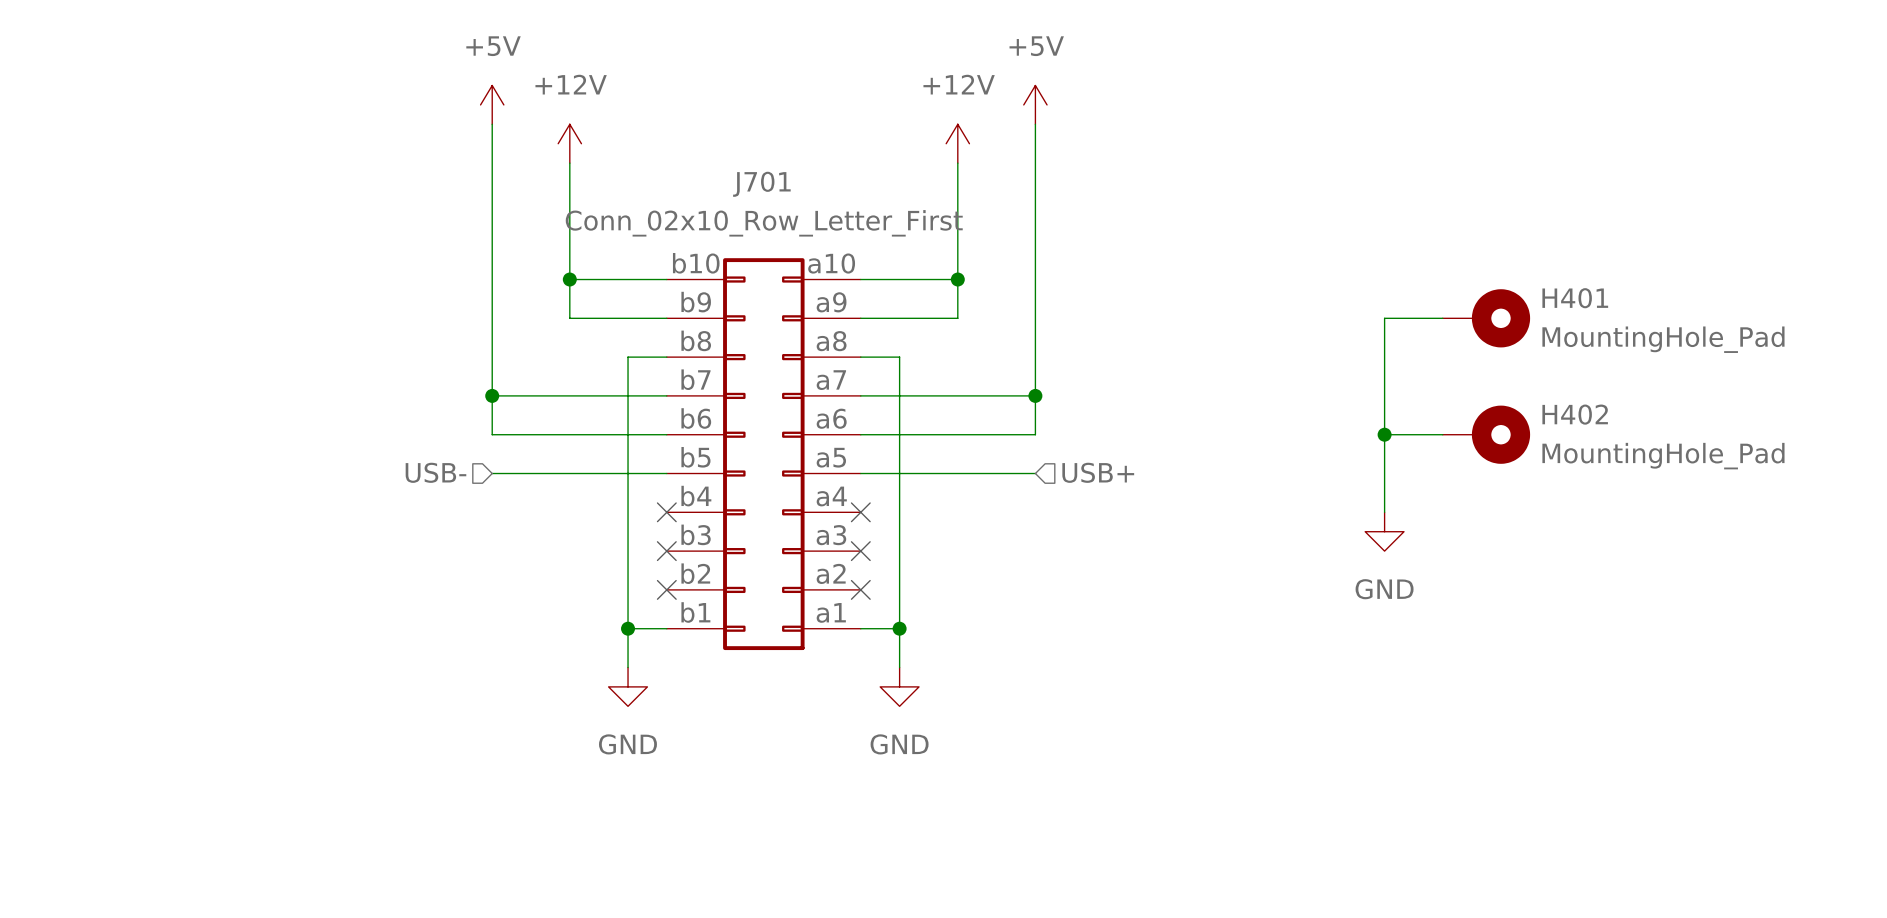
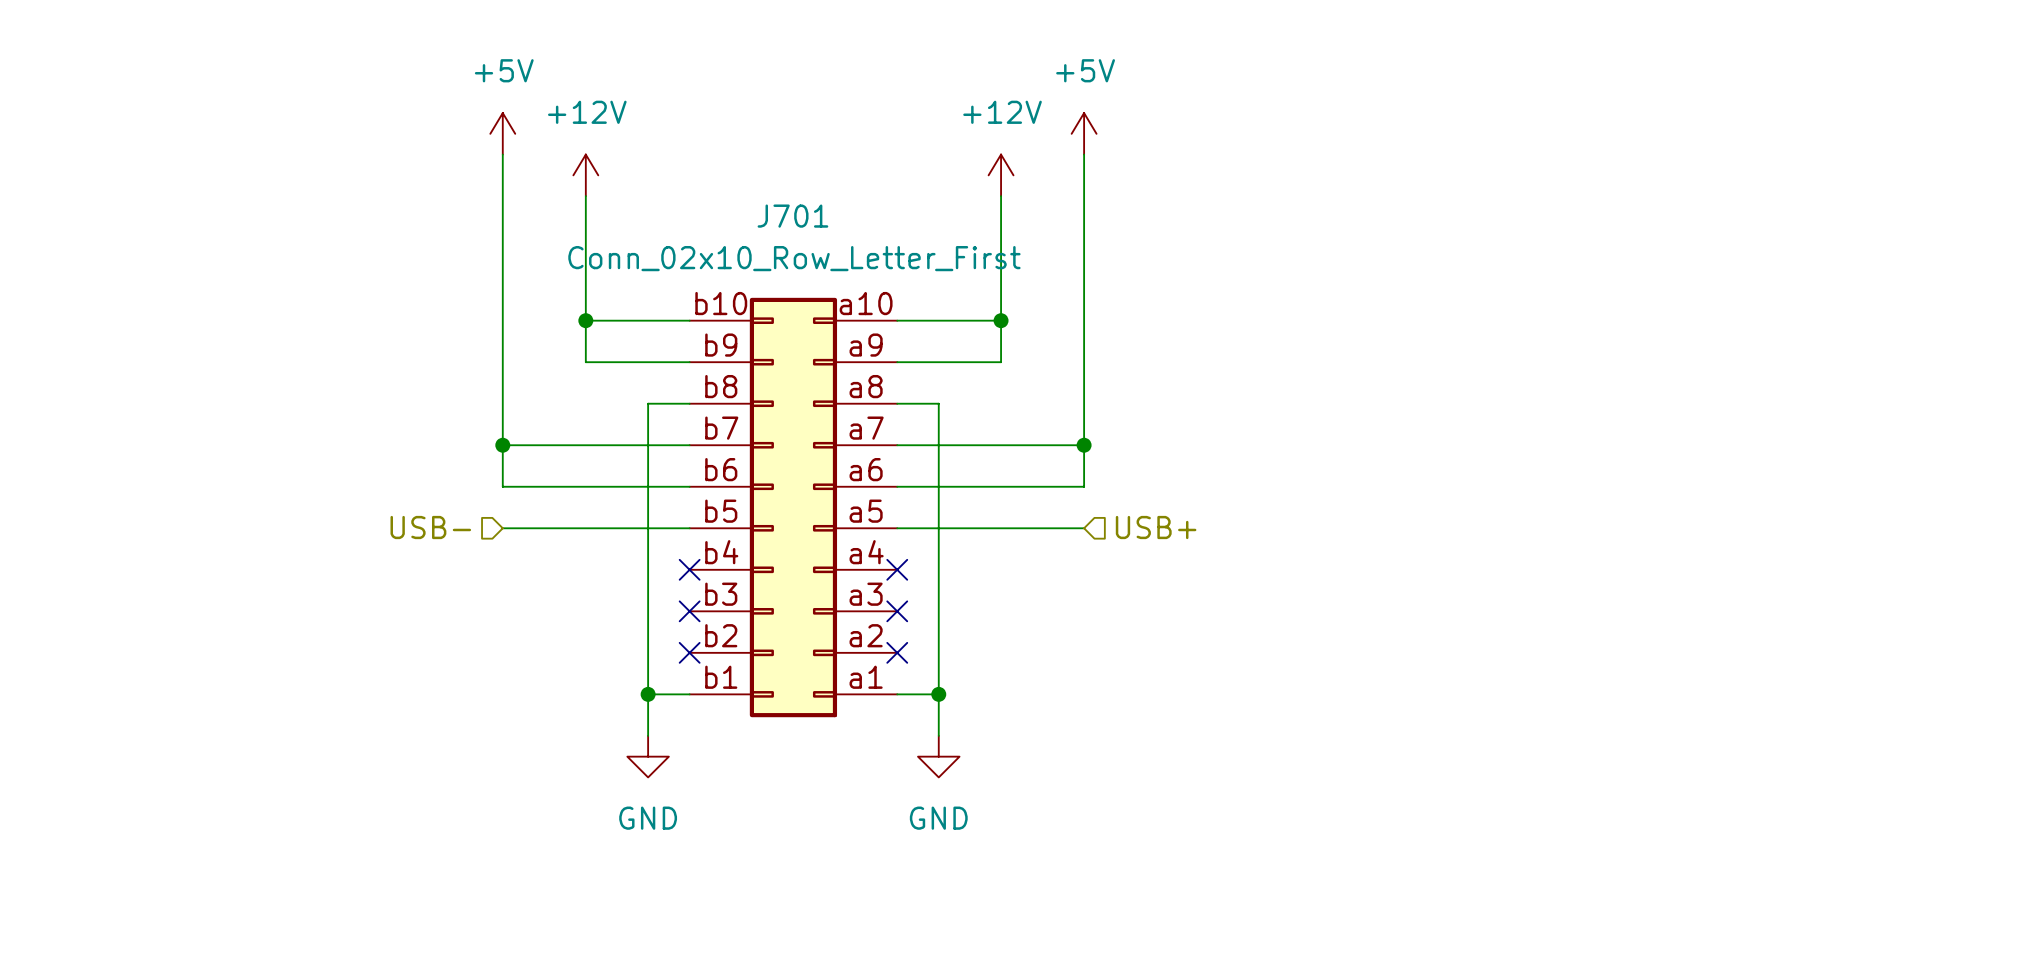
wire: (1442, 318) (1384, 318) (1384, 512) -> none
H401: MountingHole_Pad (1486, 318) -> none
wire: (1384, 434) (1442, 434) -> none
junction: (1384, 434) -> none
H402: MountingHole_Pad (1486, 434) -> none
power symbol: GND (1384, 531) -> none

